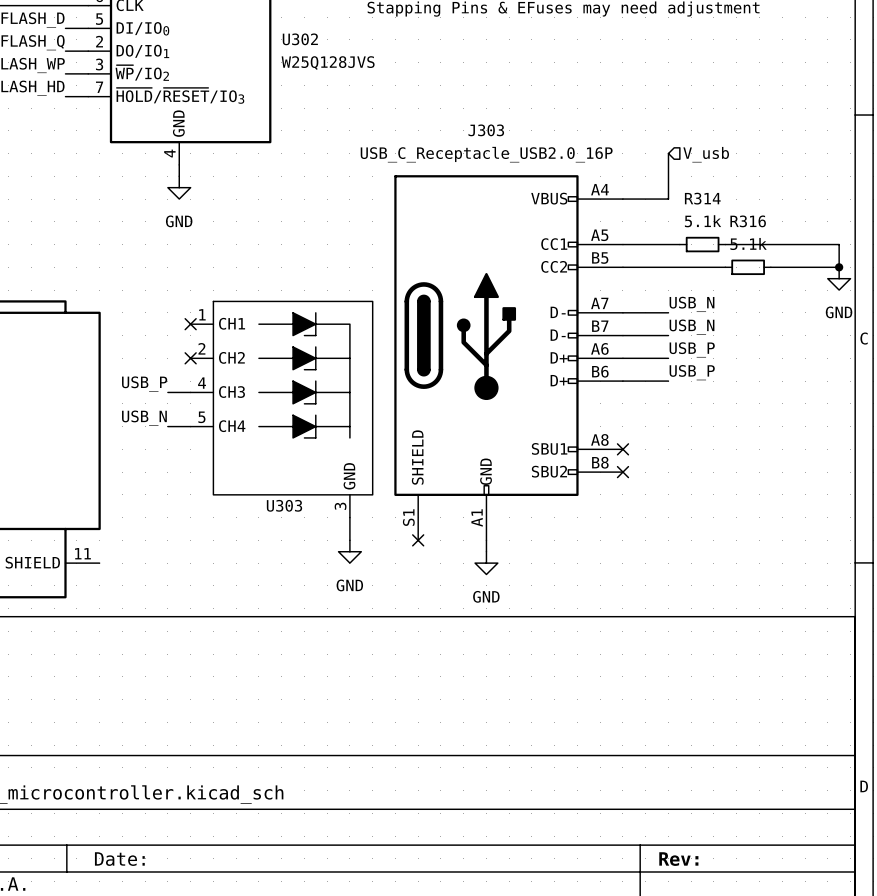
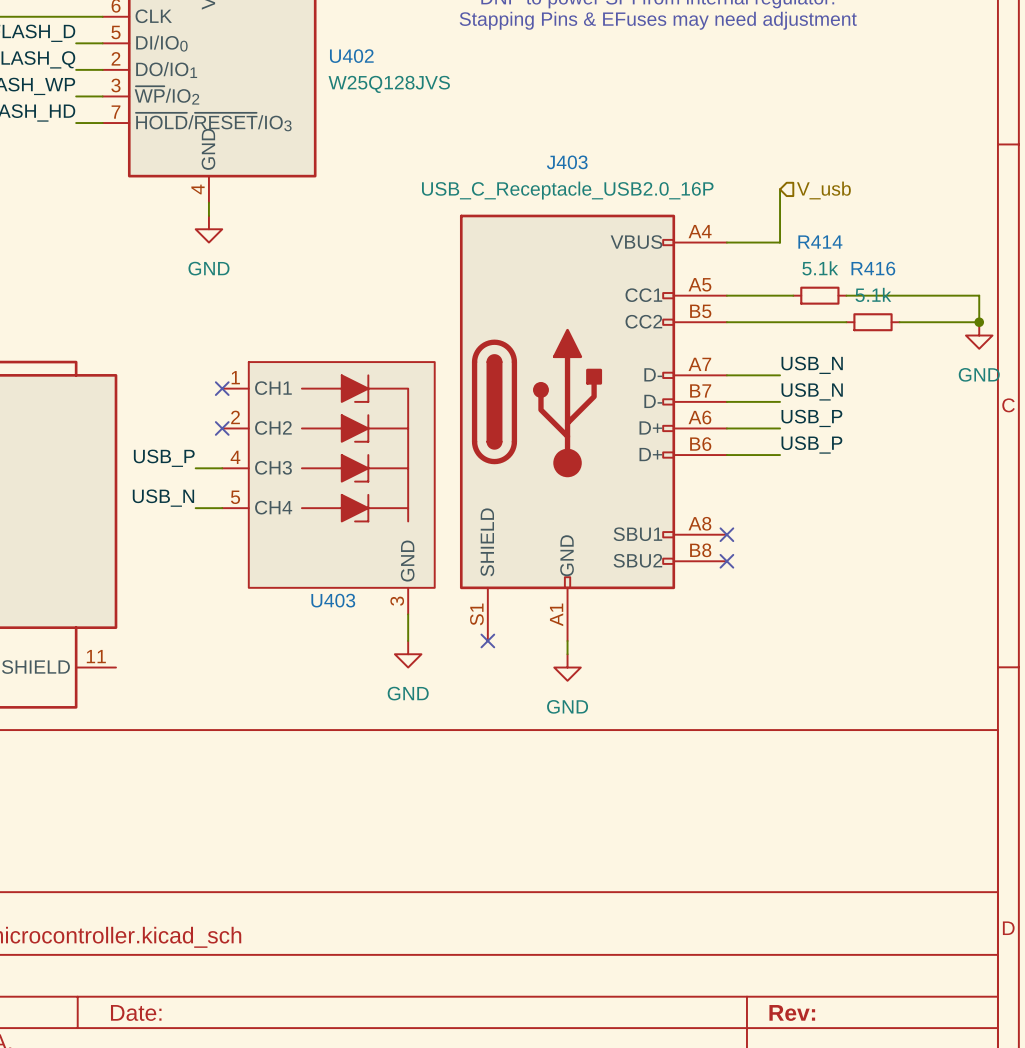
U302 name: U302 (300, 39) -> U402 (351, 56)
J303 name: J303 (486, 130) -> J403 (567, 162)
R314 name: R314 (702, 198) -> R414 (820, 242)
R316 name: R316 (748, 221) -> R416 (873, 268)
U303 name: U303 (284, 505) -> U403 (333, 600)

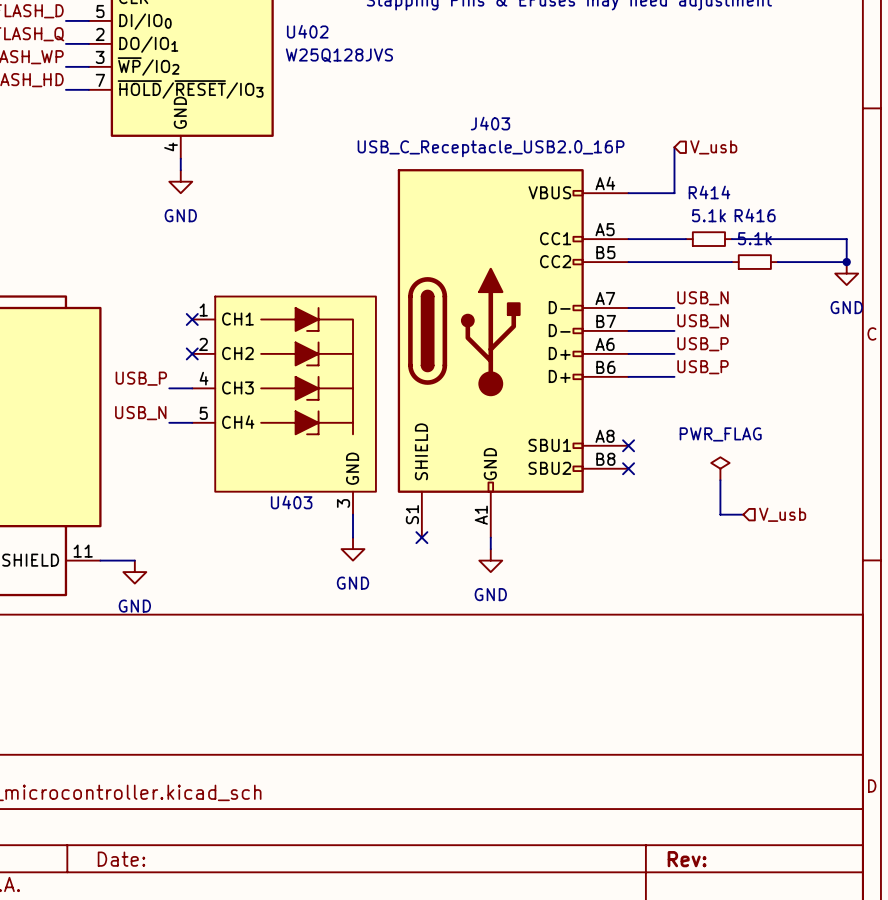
power symbol: none -> PWR_FLAG (720, 468)
wire: none -> (720, 480) (720, 514) (743, 514)
hierarchical label: none -> V_usb (782, 514)
wire: none -> (100, 560) (134, 560)
power symbol: none -> GND (134, 572)

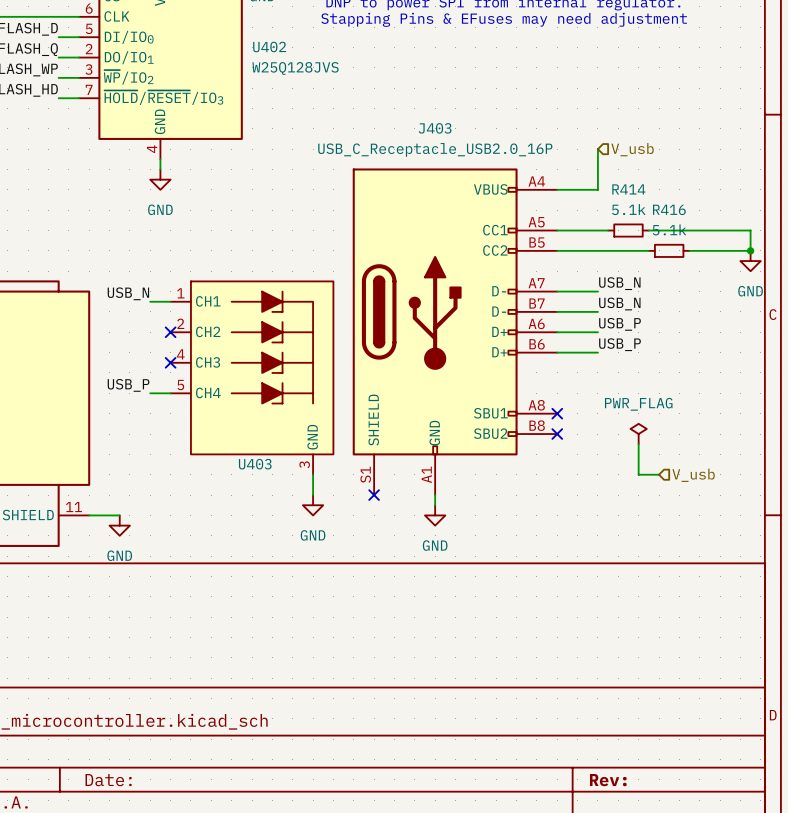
label: none -> USB_N (128, 293)
no-connect mark: (192, 319) -> none
label: USB_P (141, 378) -> none
wire: (169, 388) (192, 388) -> (150, 301) (170, 301)
no-connect mark: none -> (170, 362)
label: USB_N (140, 413) -> USB_P (128, 385)

